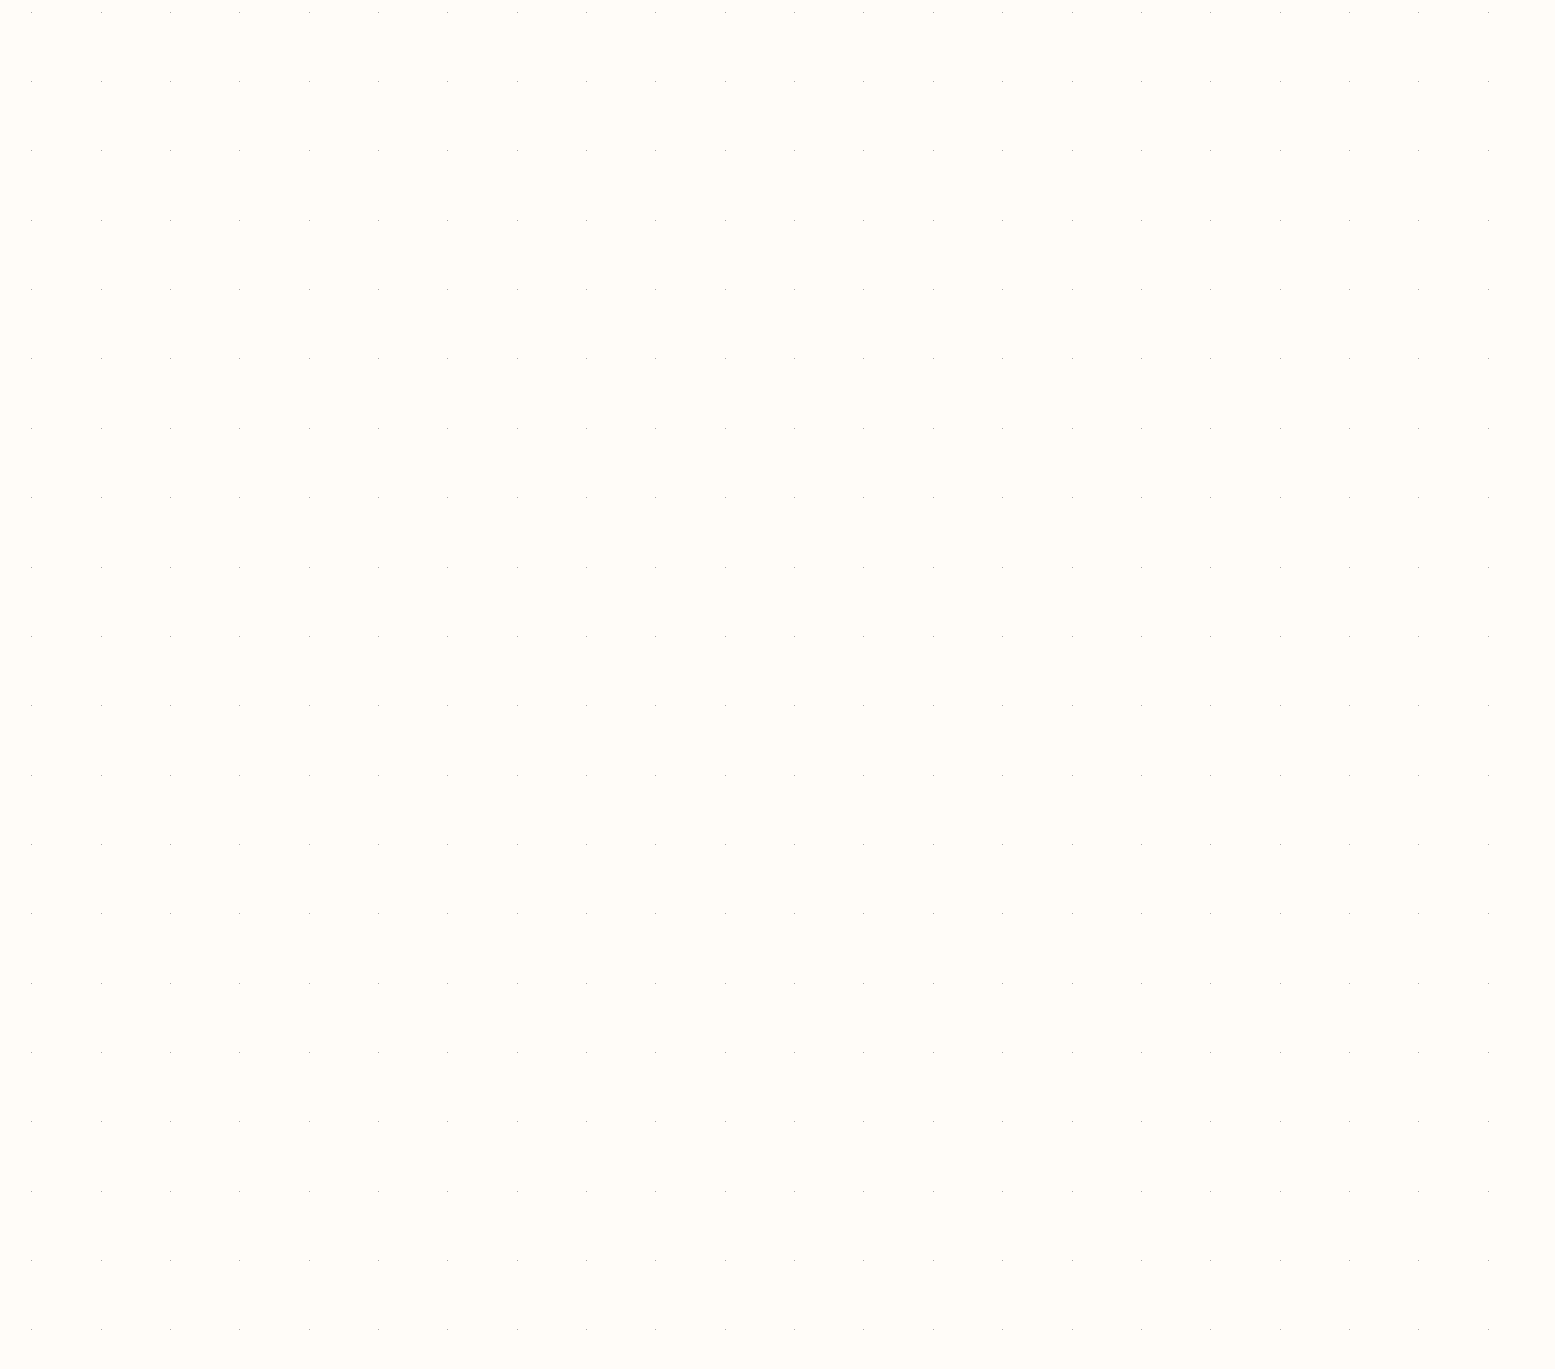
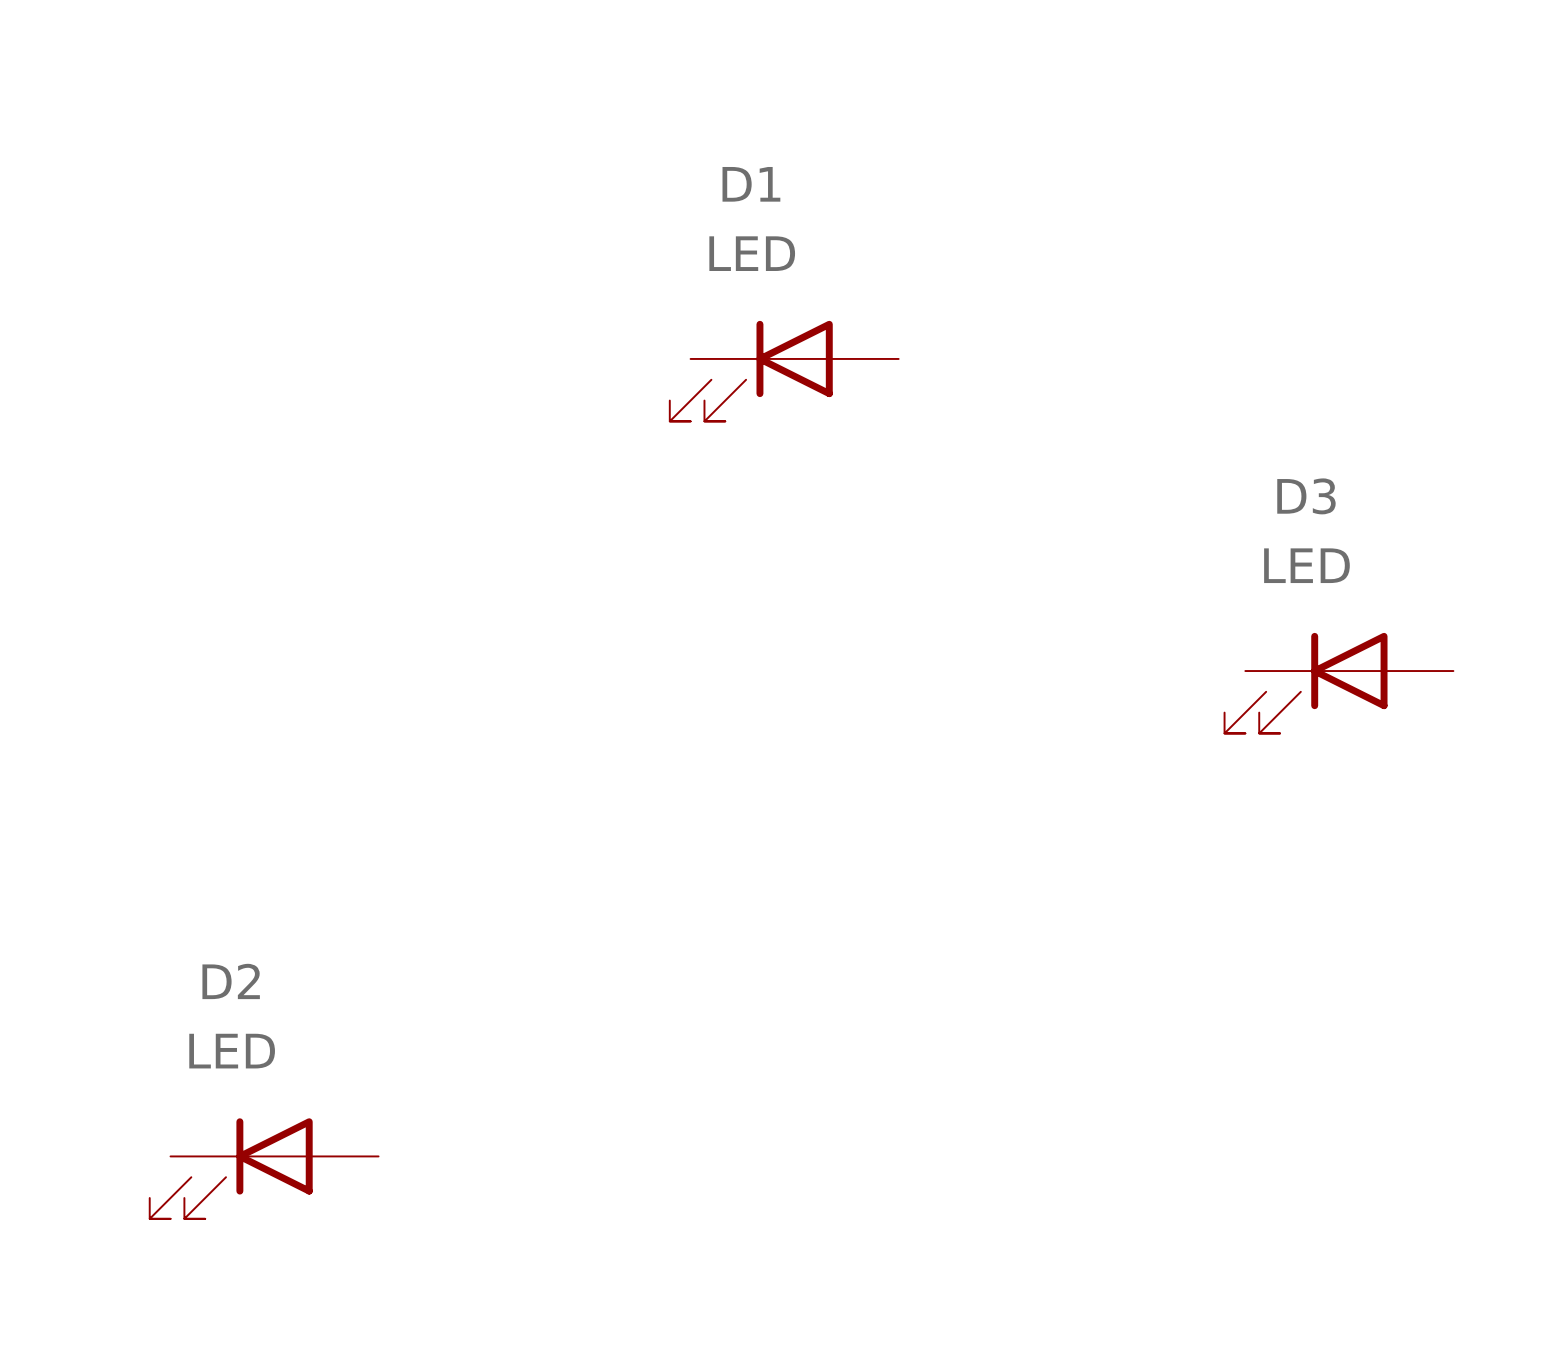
D1: none -> LED (784, 371)
D3: none -> LED (1338, 683)
D2: none -> LED (264, 1168)

